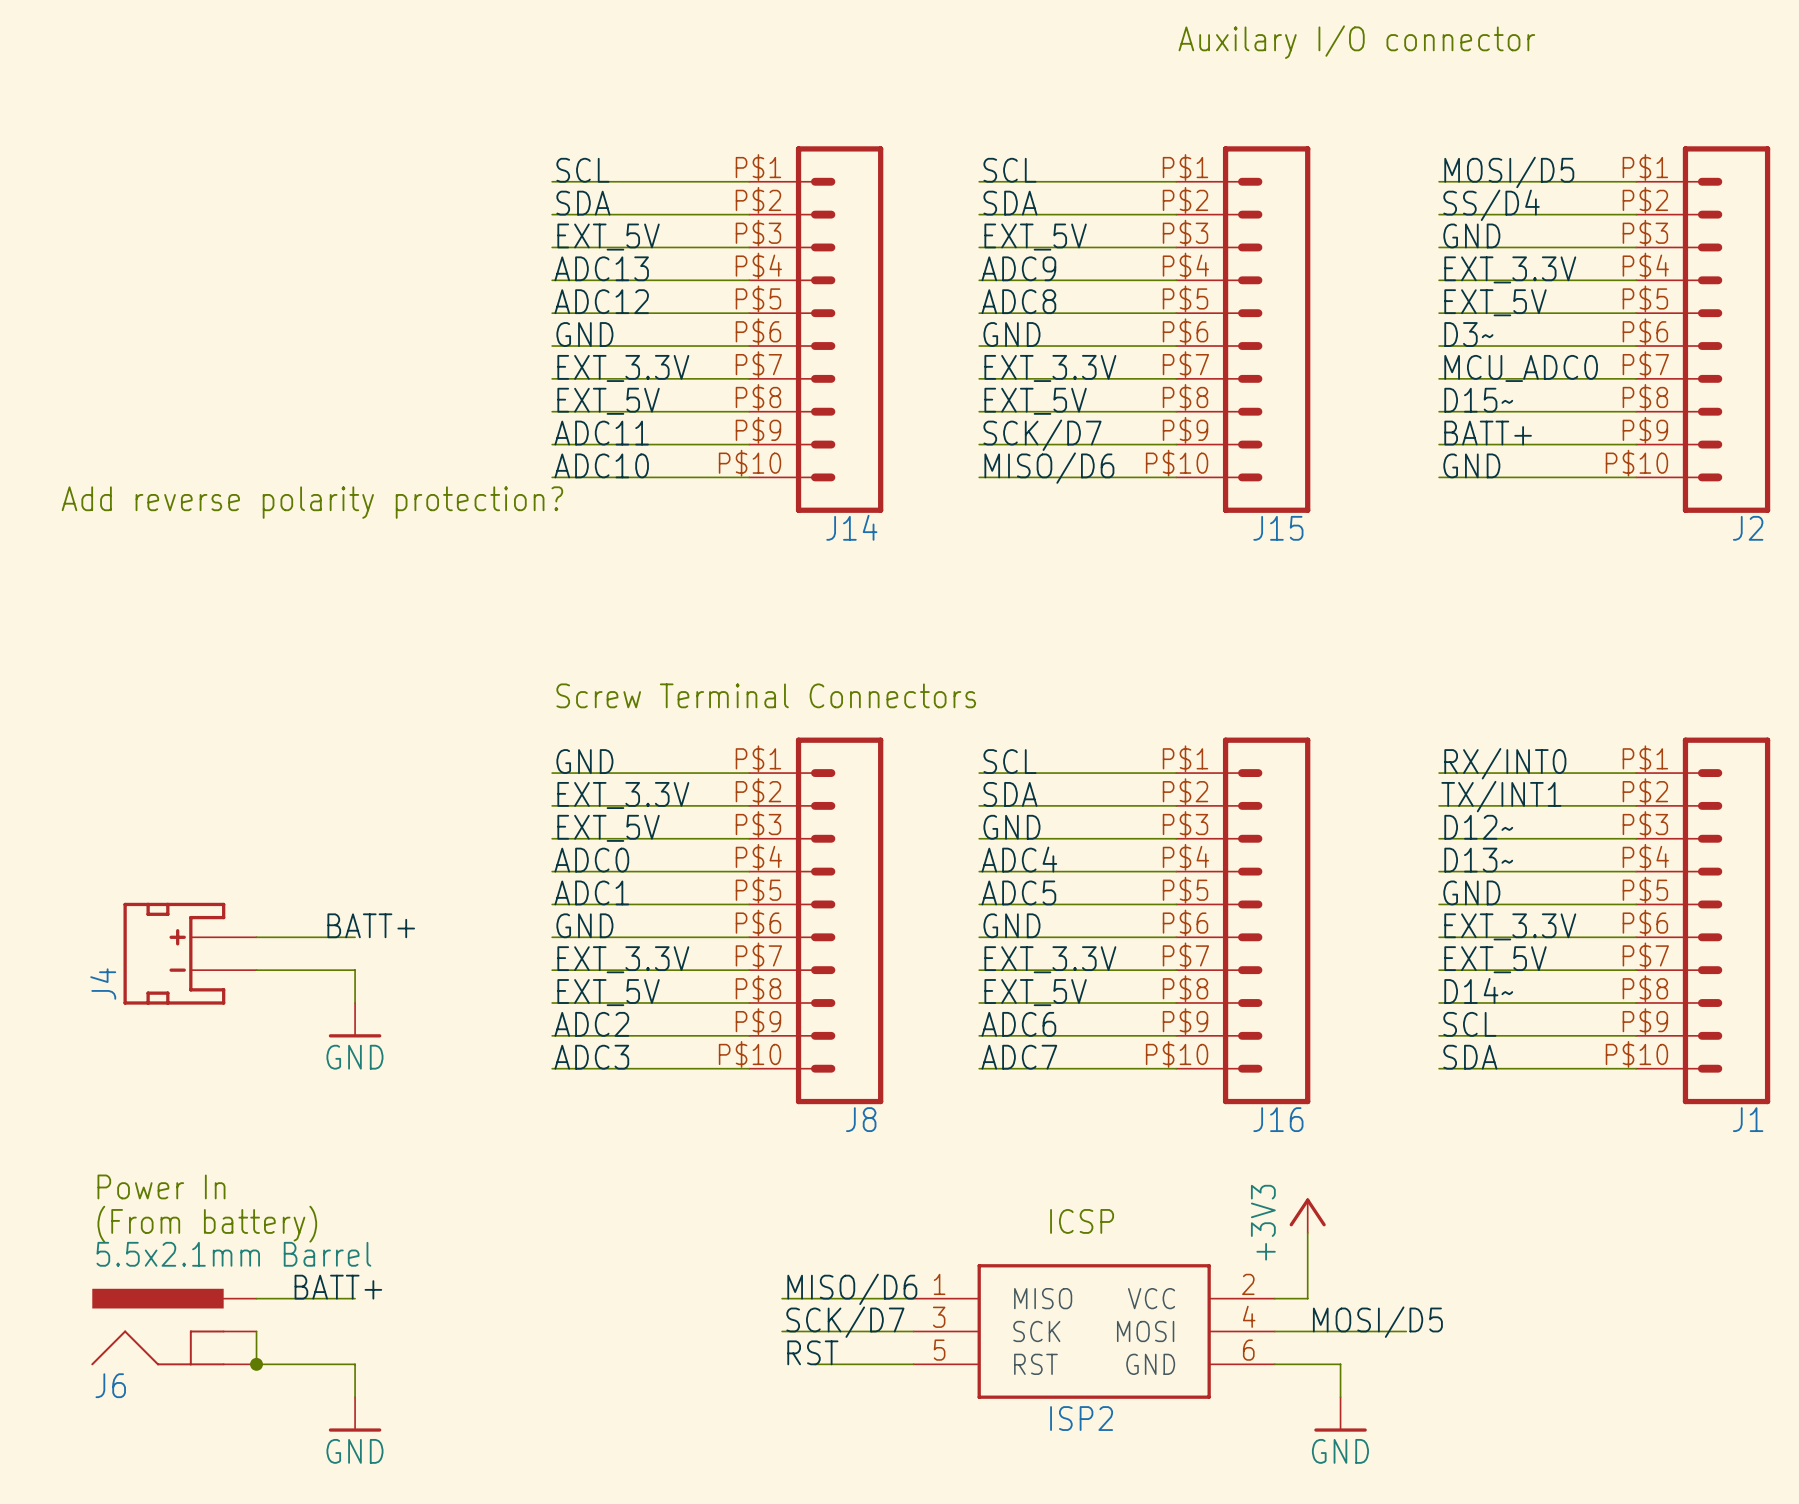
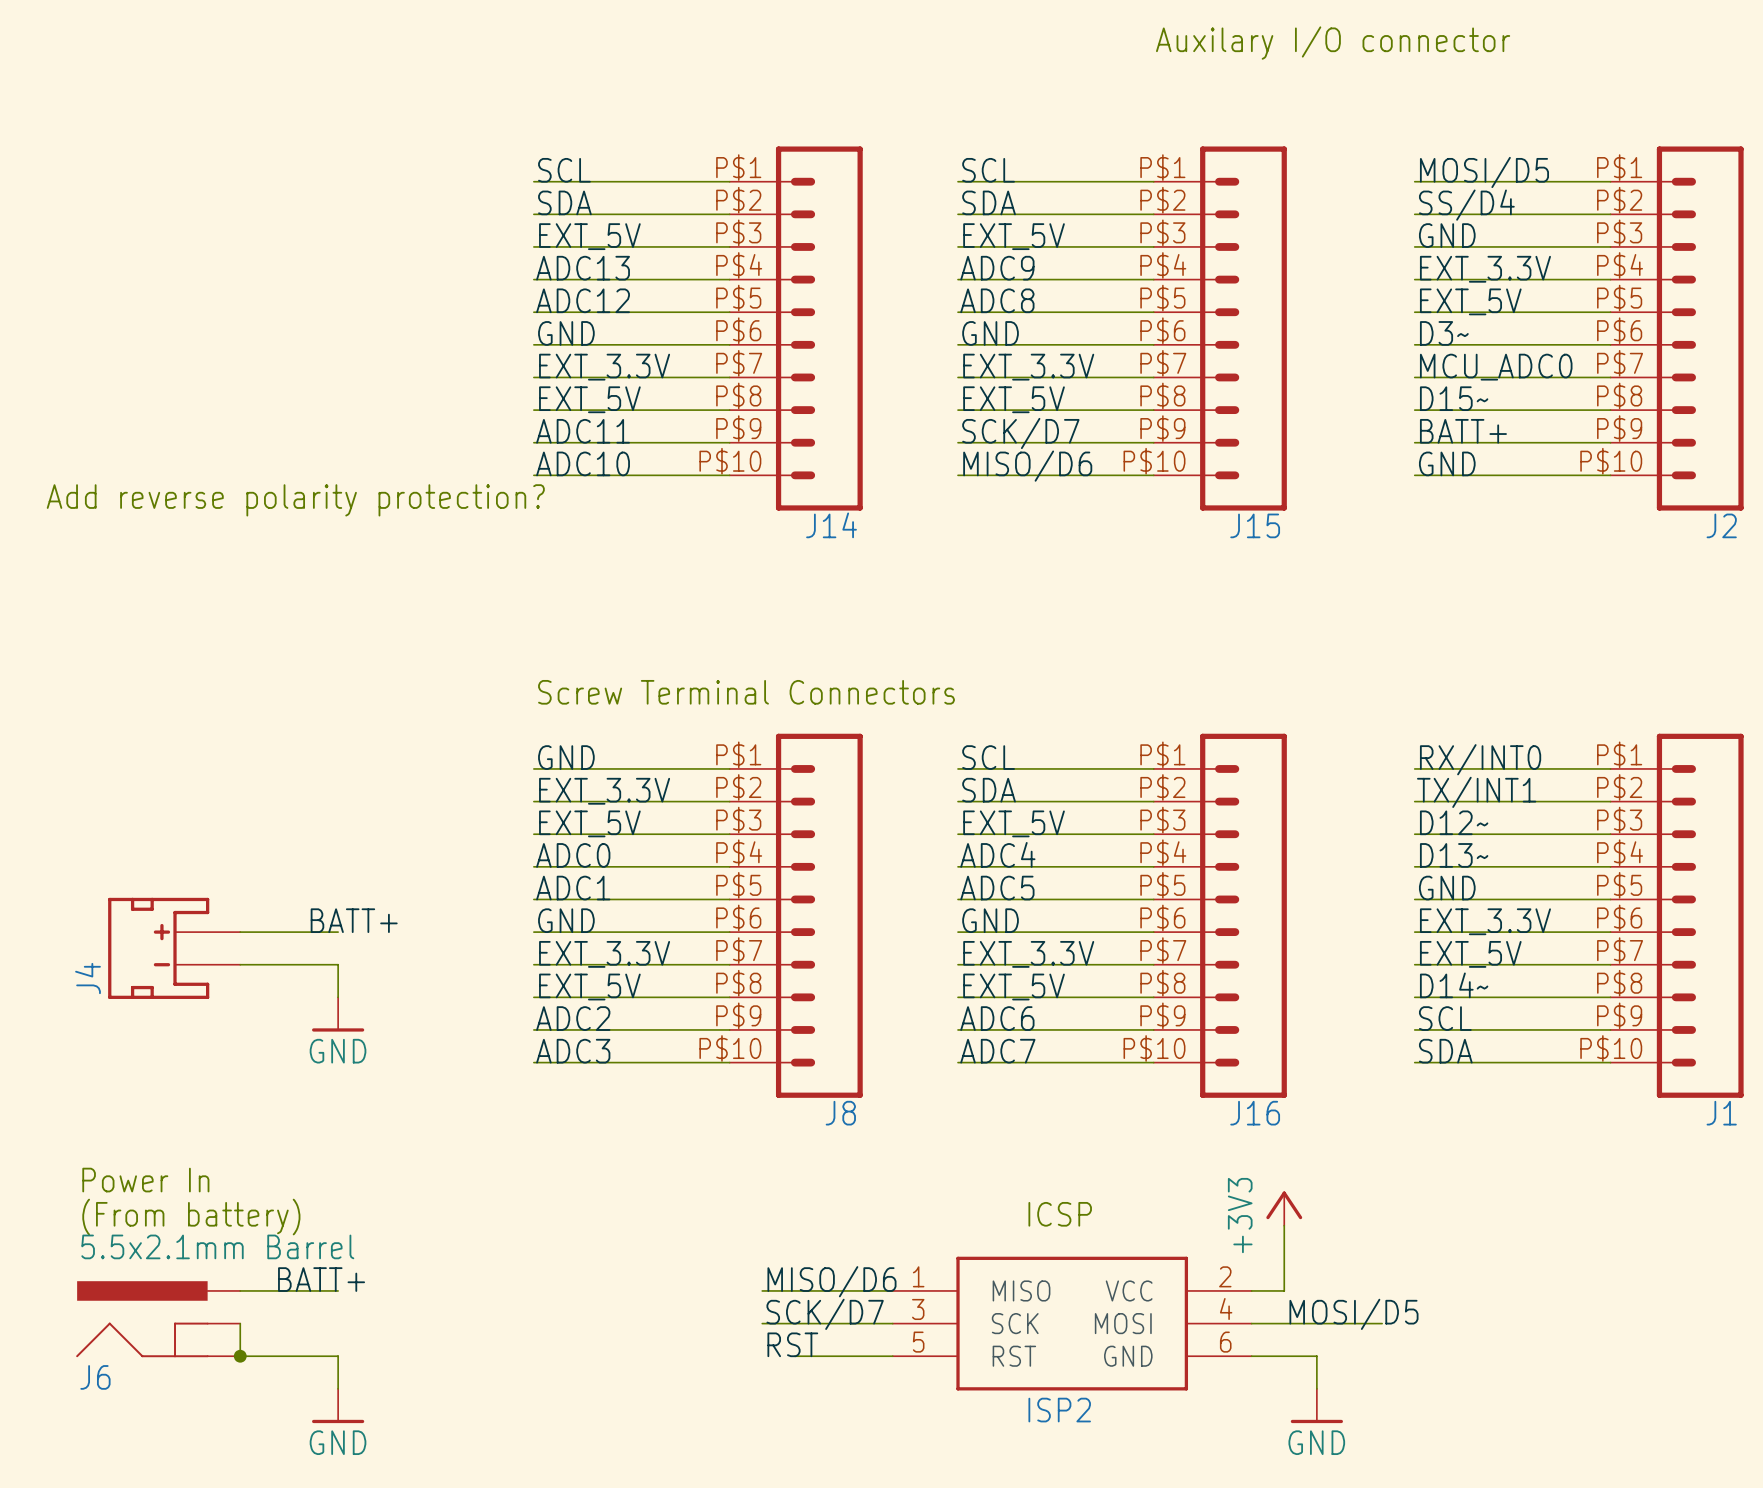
label: GND (1011, 827) -> EXT_5V (1014, 823)

